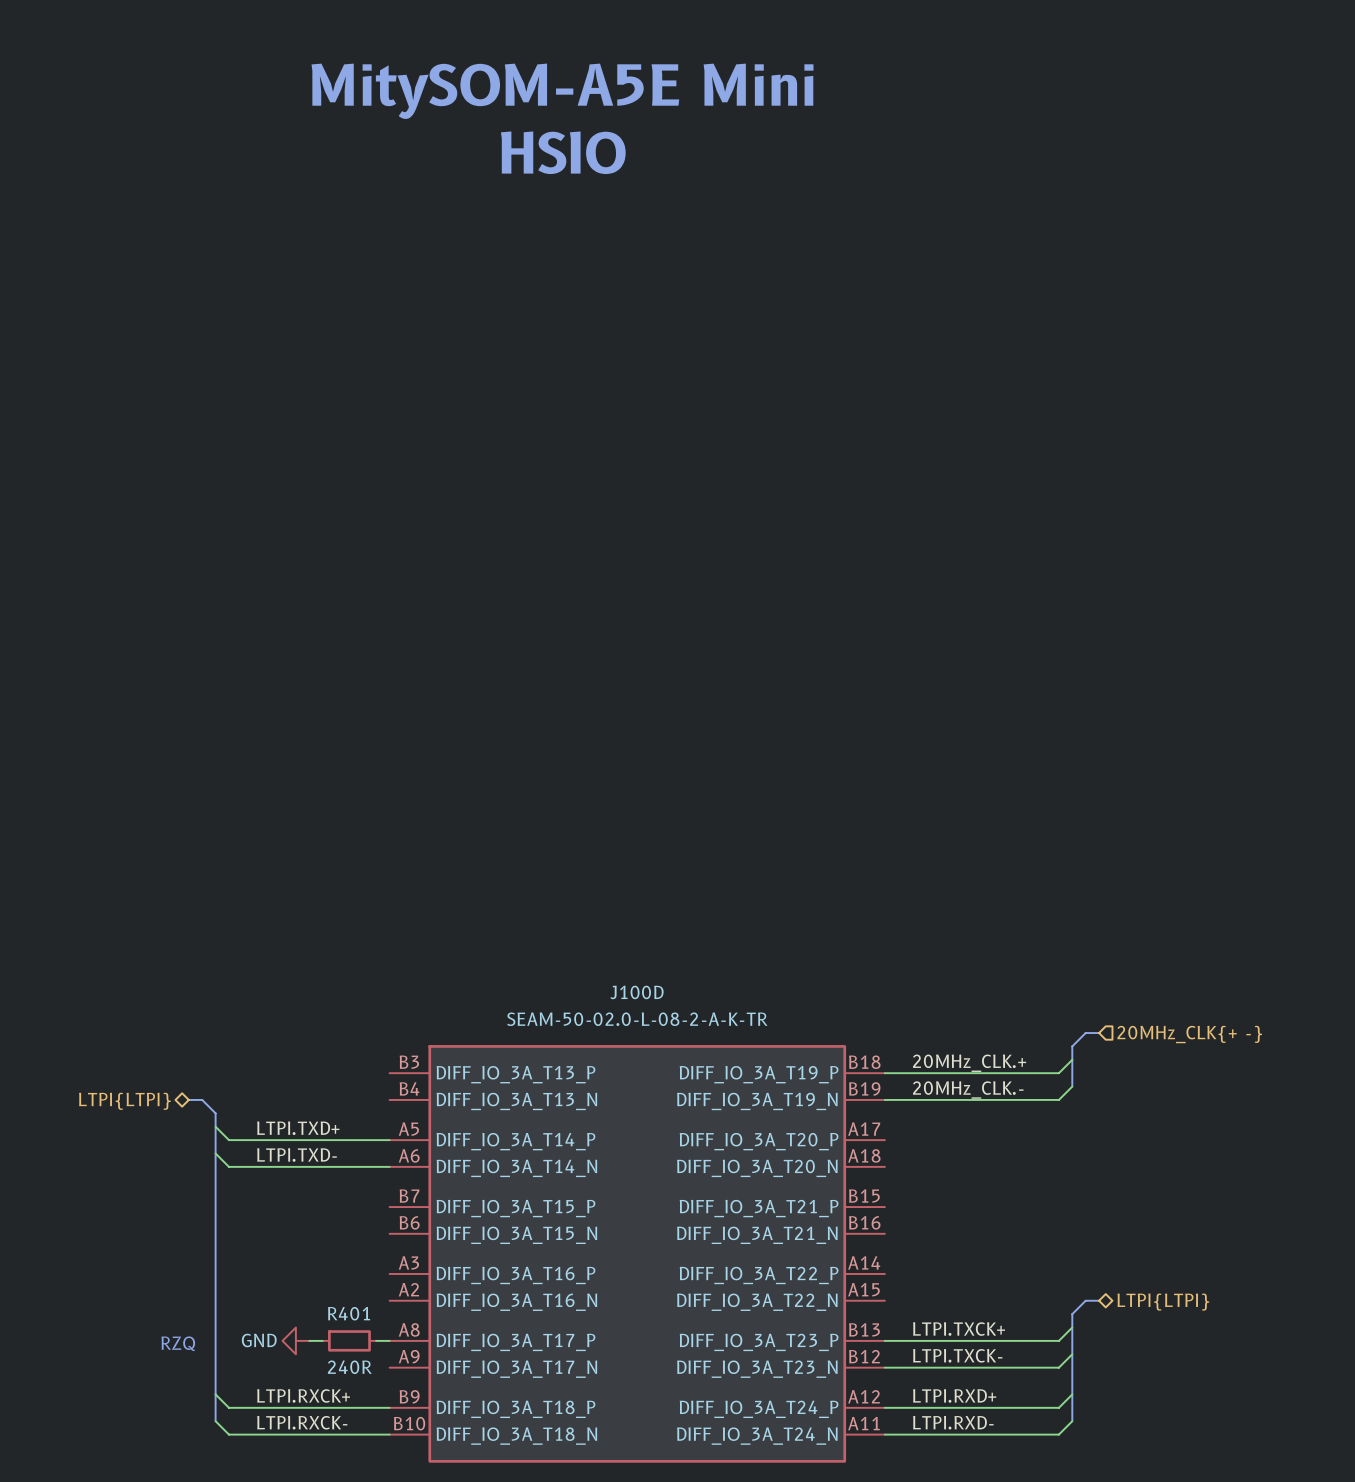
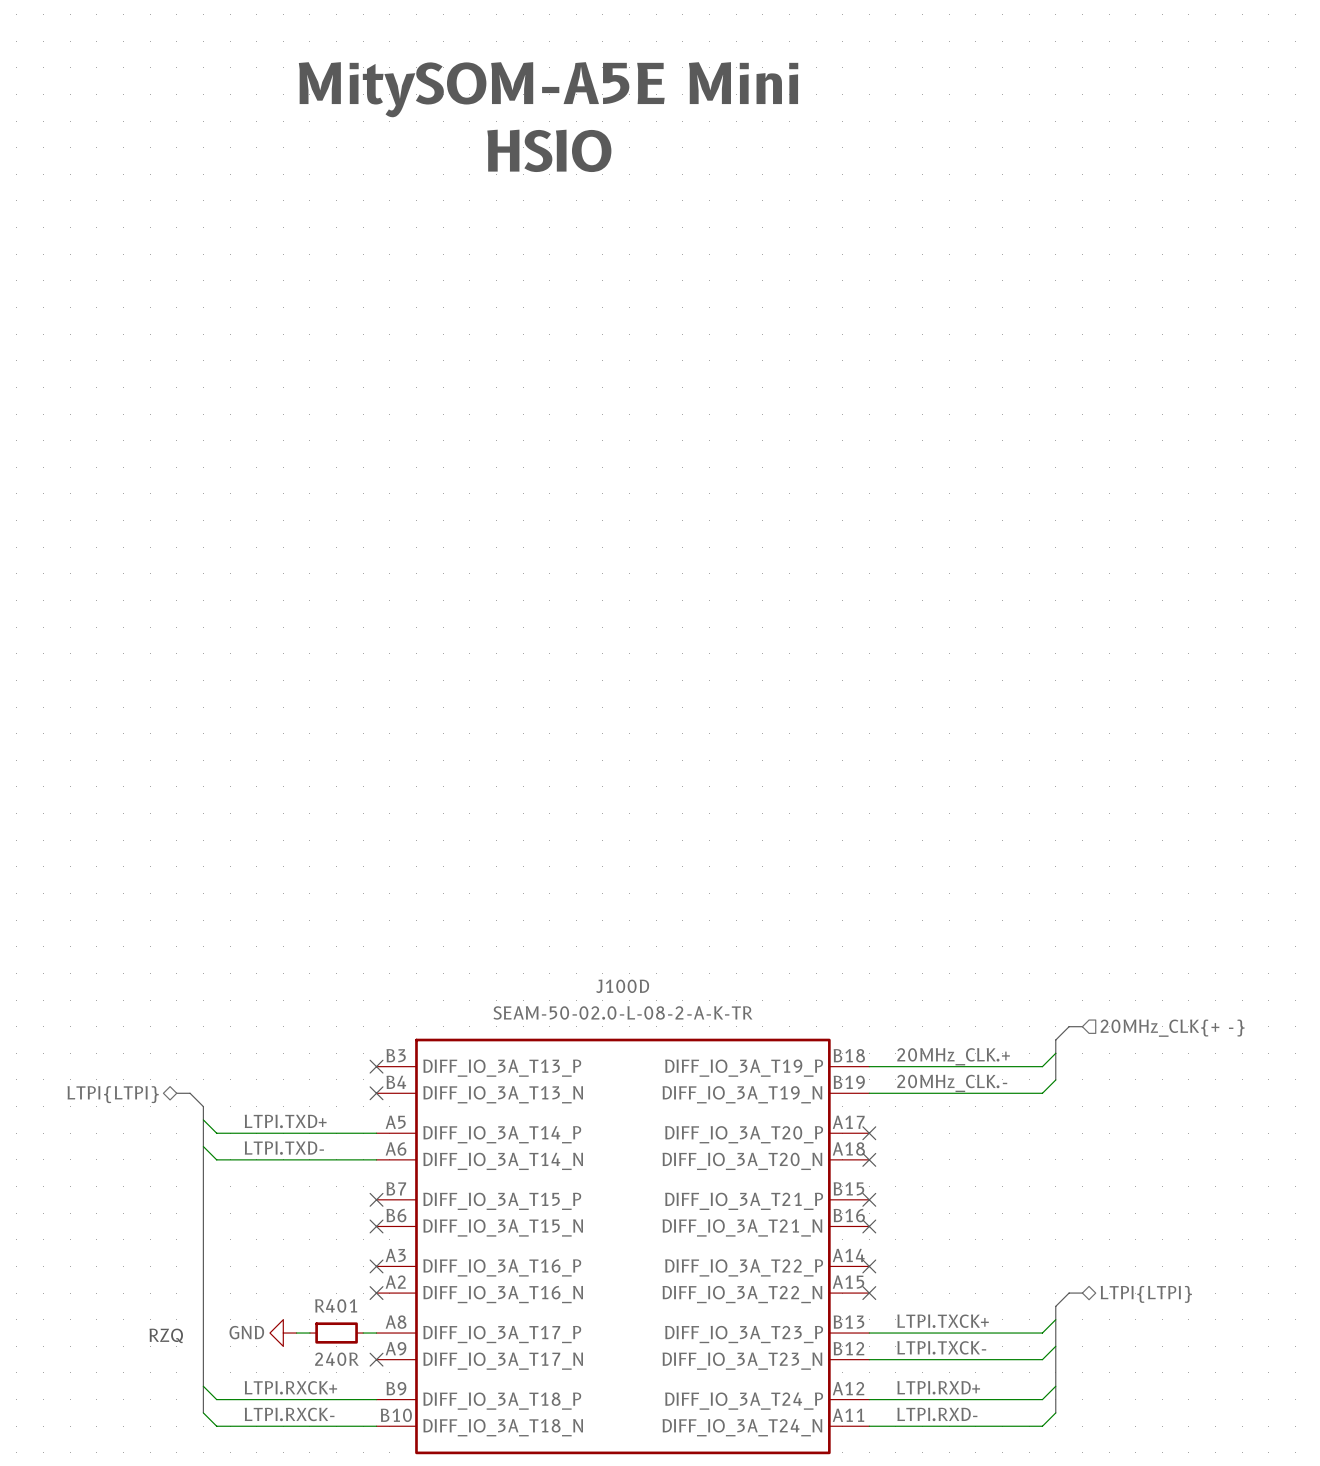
no-connect mark: none -> (376, 1066)
no-connect mark: none -> (376, 1093)
no-connect mark: none -> (869, 1133)
no-connect mark: none -> (869, 1159)
no-connect mark: none -> (376, 1199)
no-connect mark: none -> (869, 1199)
no-connect mark: none -> (376, 1226)
no-connect mark: none -> (869, 1226)
no-connect mark: none -> (376, 1266)
no-connect mark: none -> (869, 1266)
no-connect mark: none -> (376, 1293)
no-connect mark: none -> (869, 1293)
no-connect mark: none -> (376, 1359)

